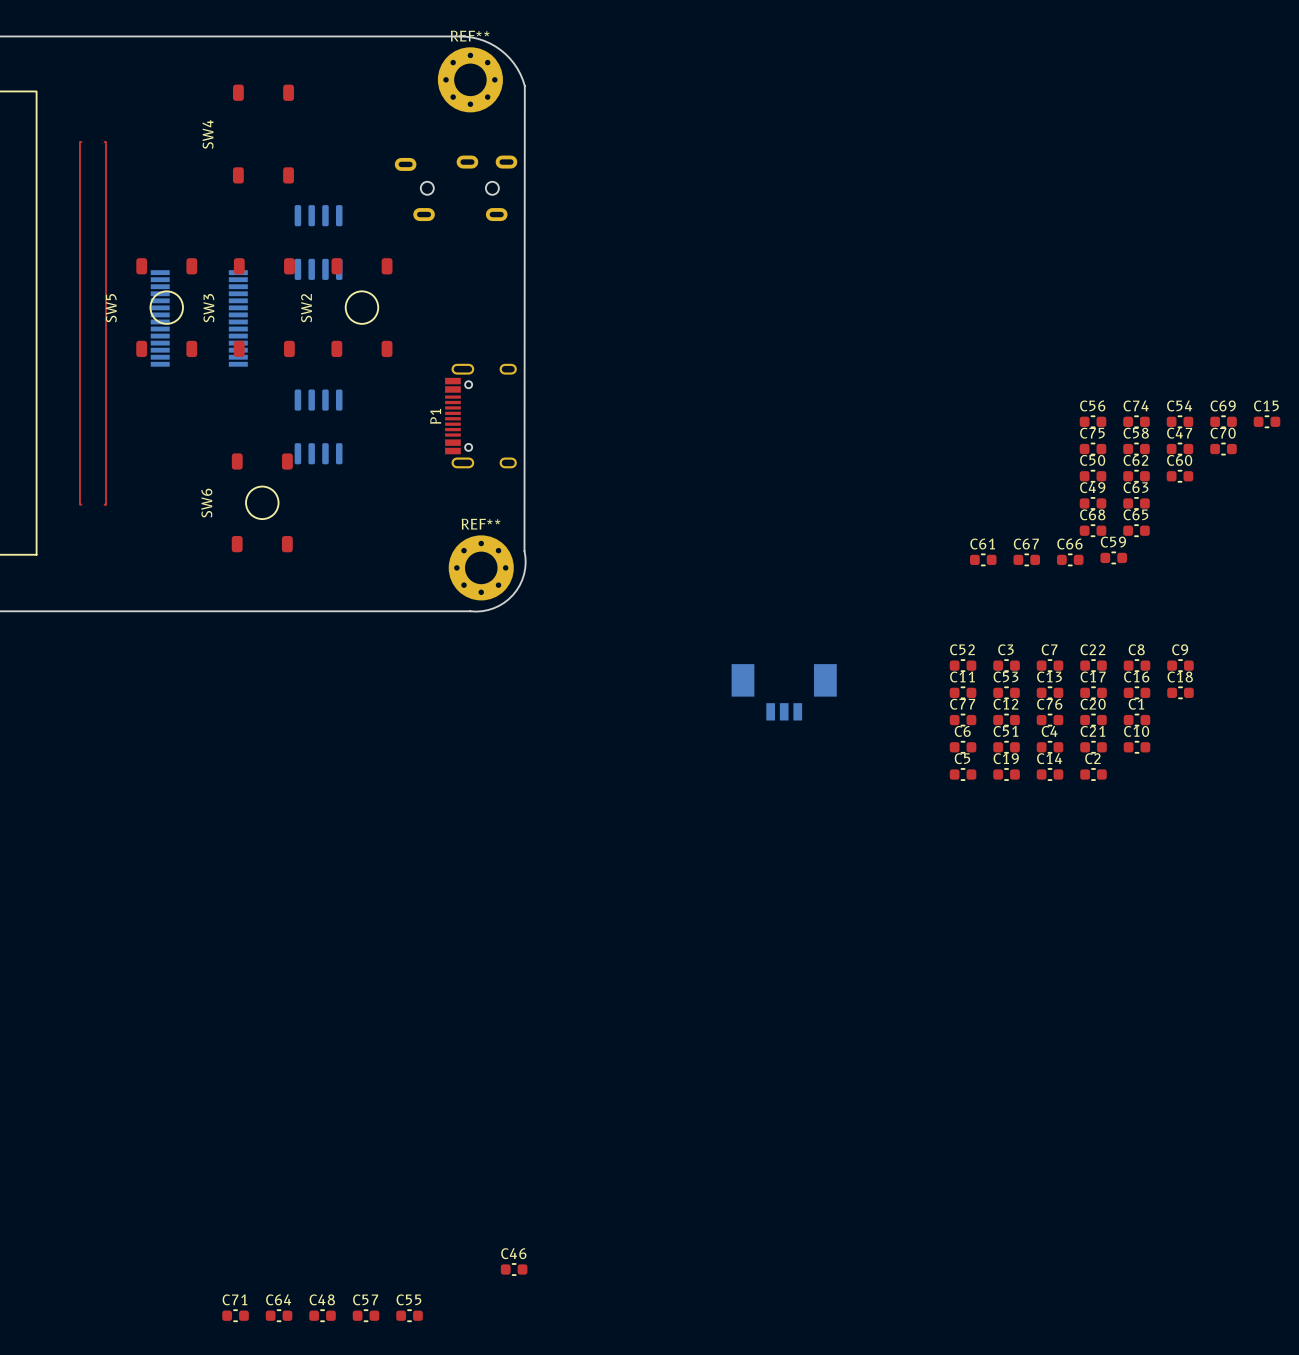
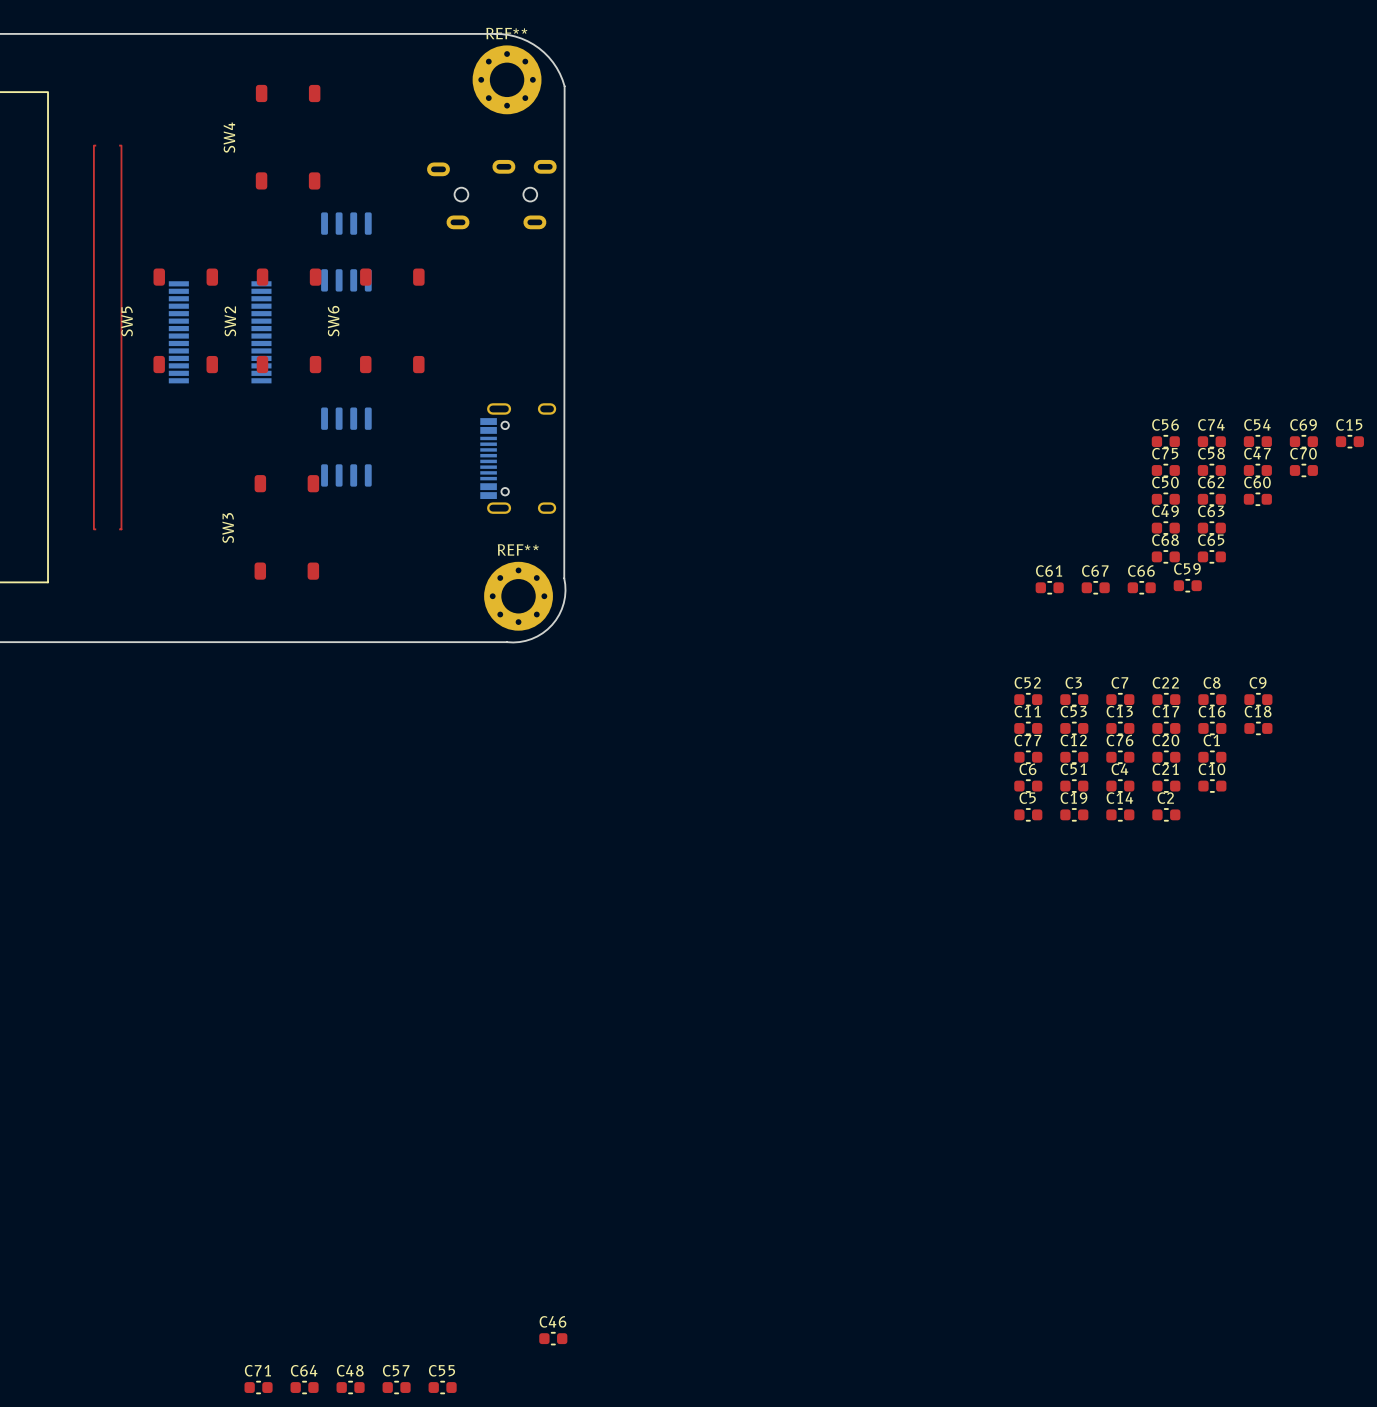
SW5 footprint: [136, 258, 198, 358] -> [153, 268, 219, 374]
SW2: (361, 307) -> none
SW3 name: SW3 (208, 308) -> SW2 (230, 321)
P1 side: top (481, 416) -> bottom (518, 458)
SW6 footprint: [231, 453, 293, 553] -> [360, 268, 425, 374]
SW3: none -> (286, 527)
part: (784, 692) -> none

